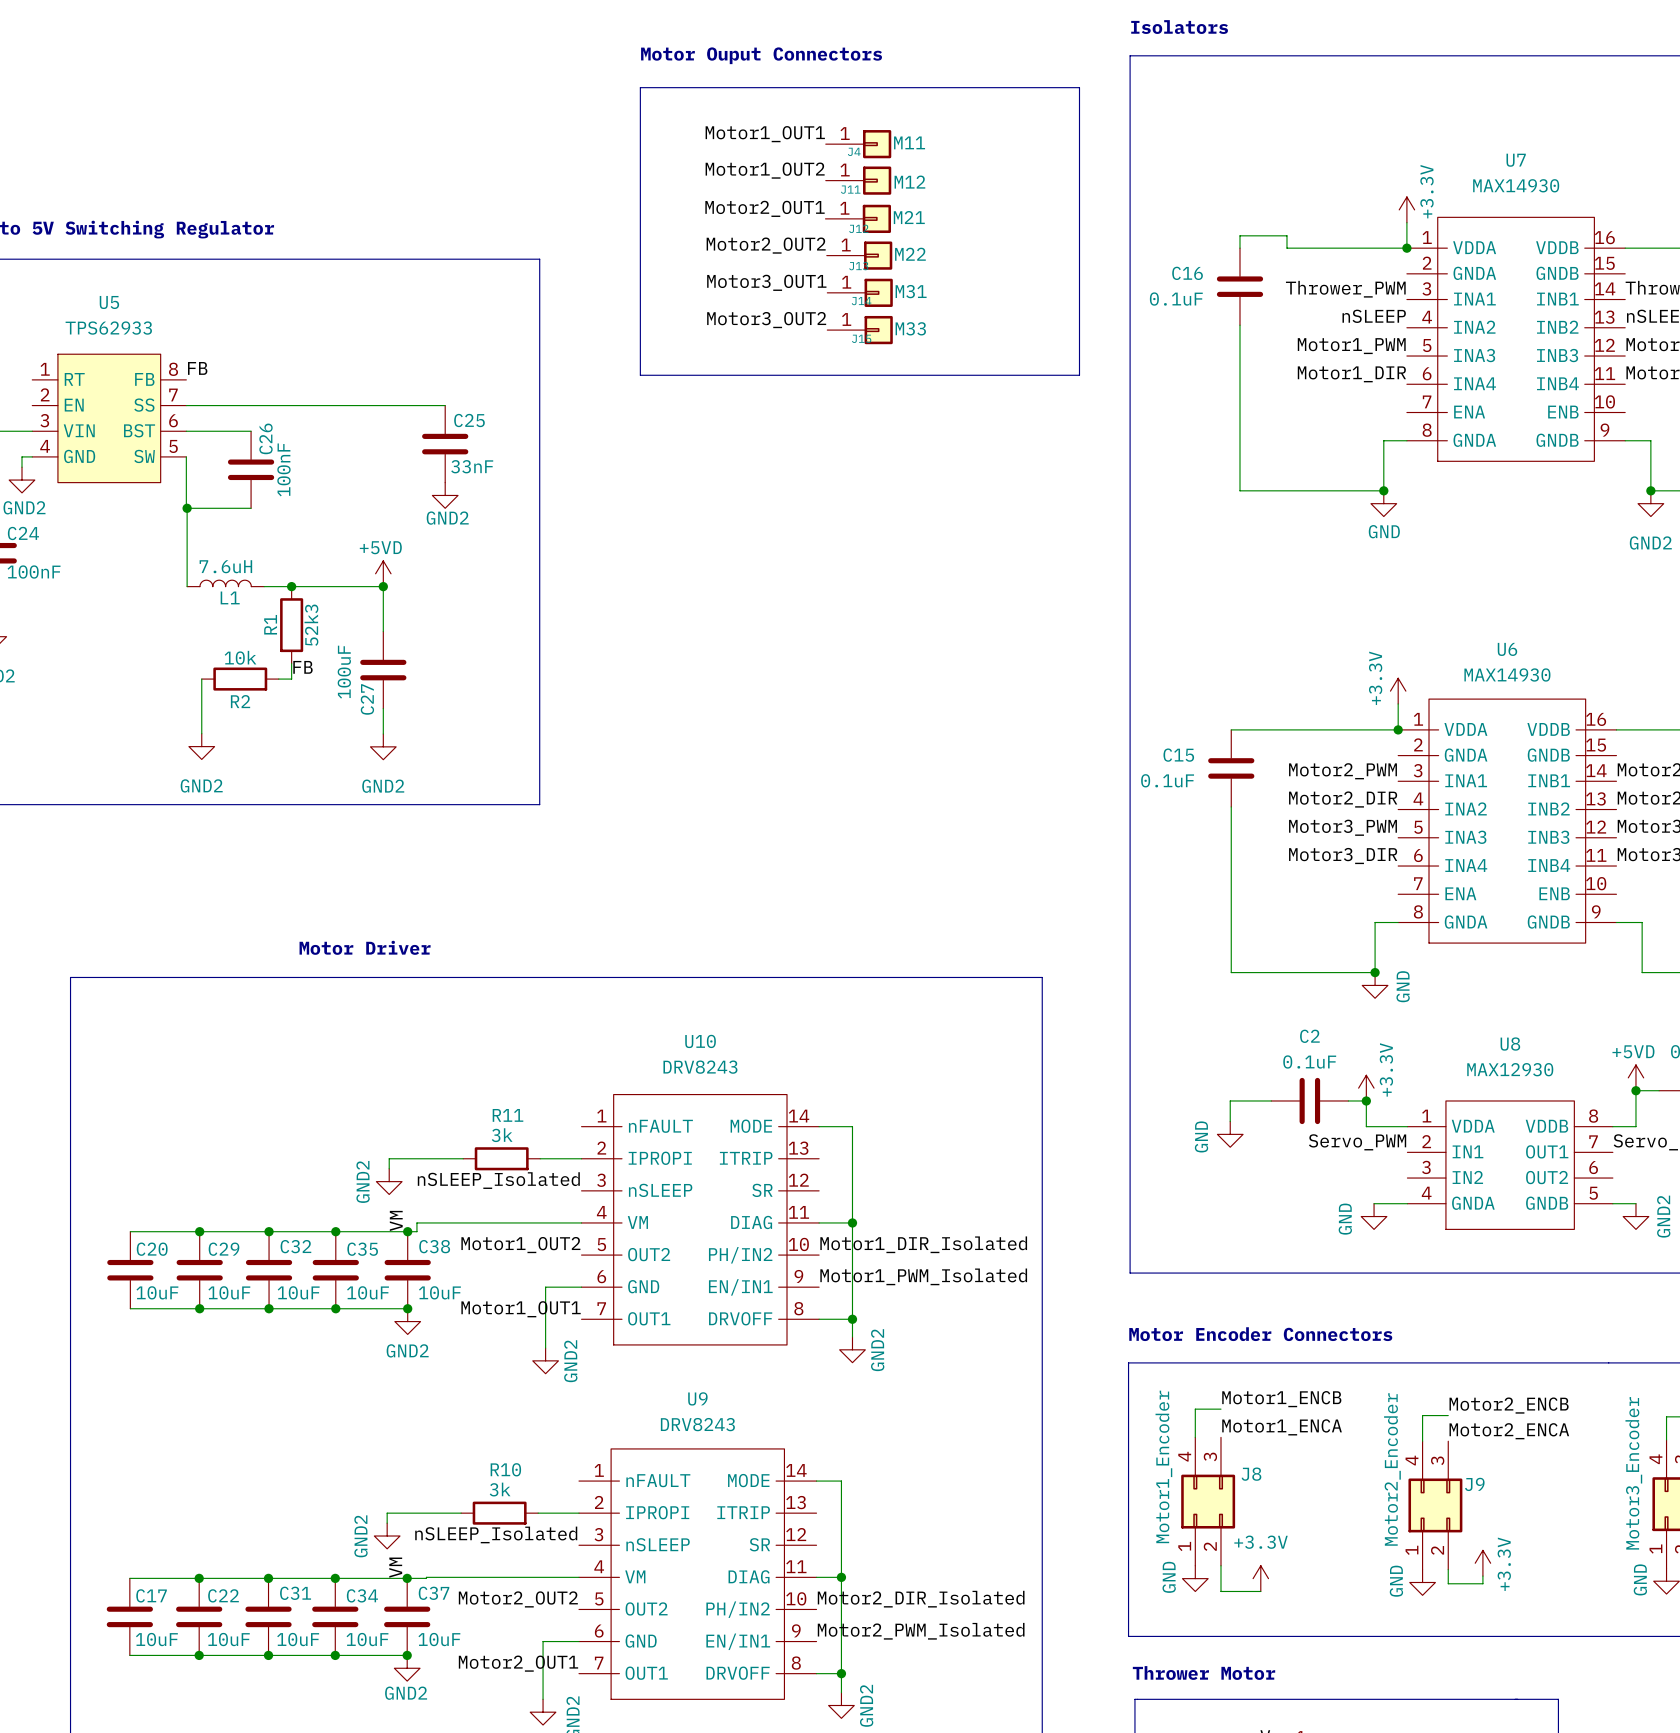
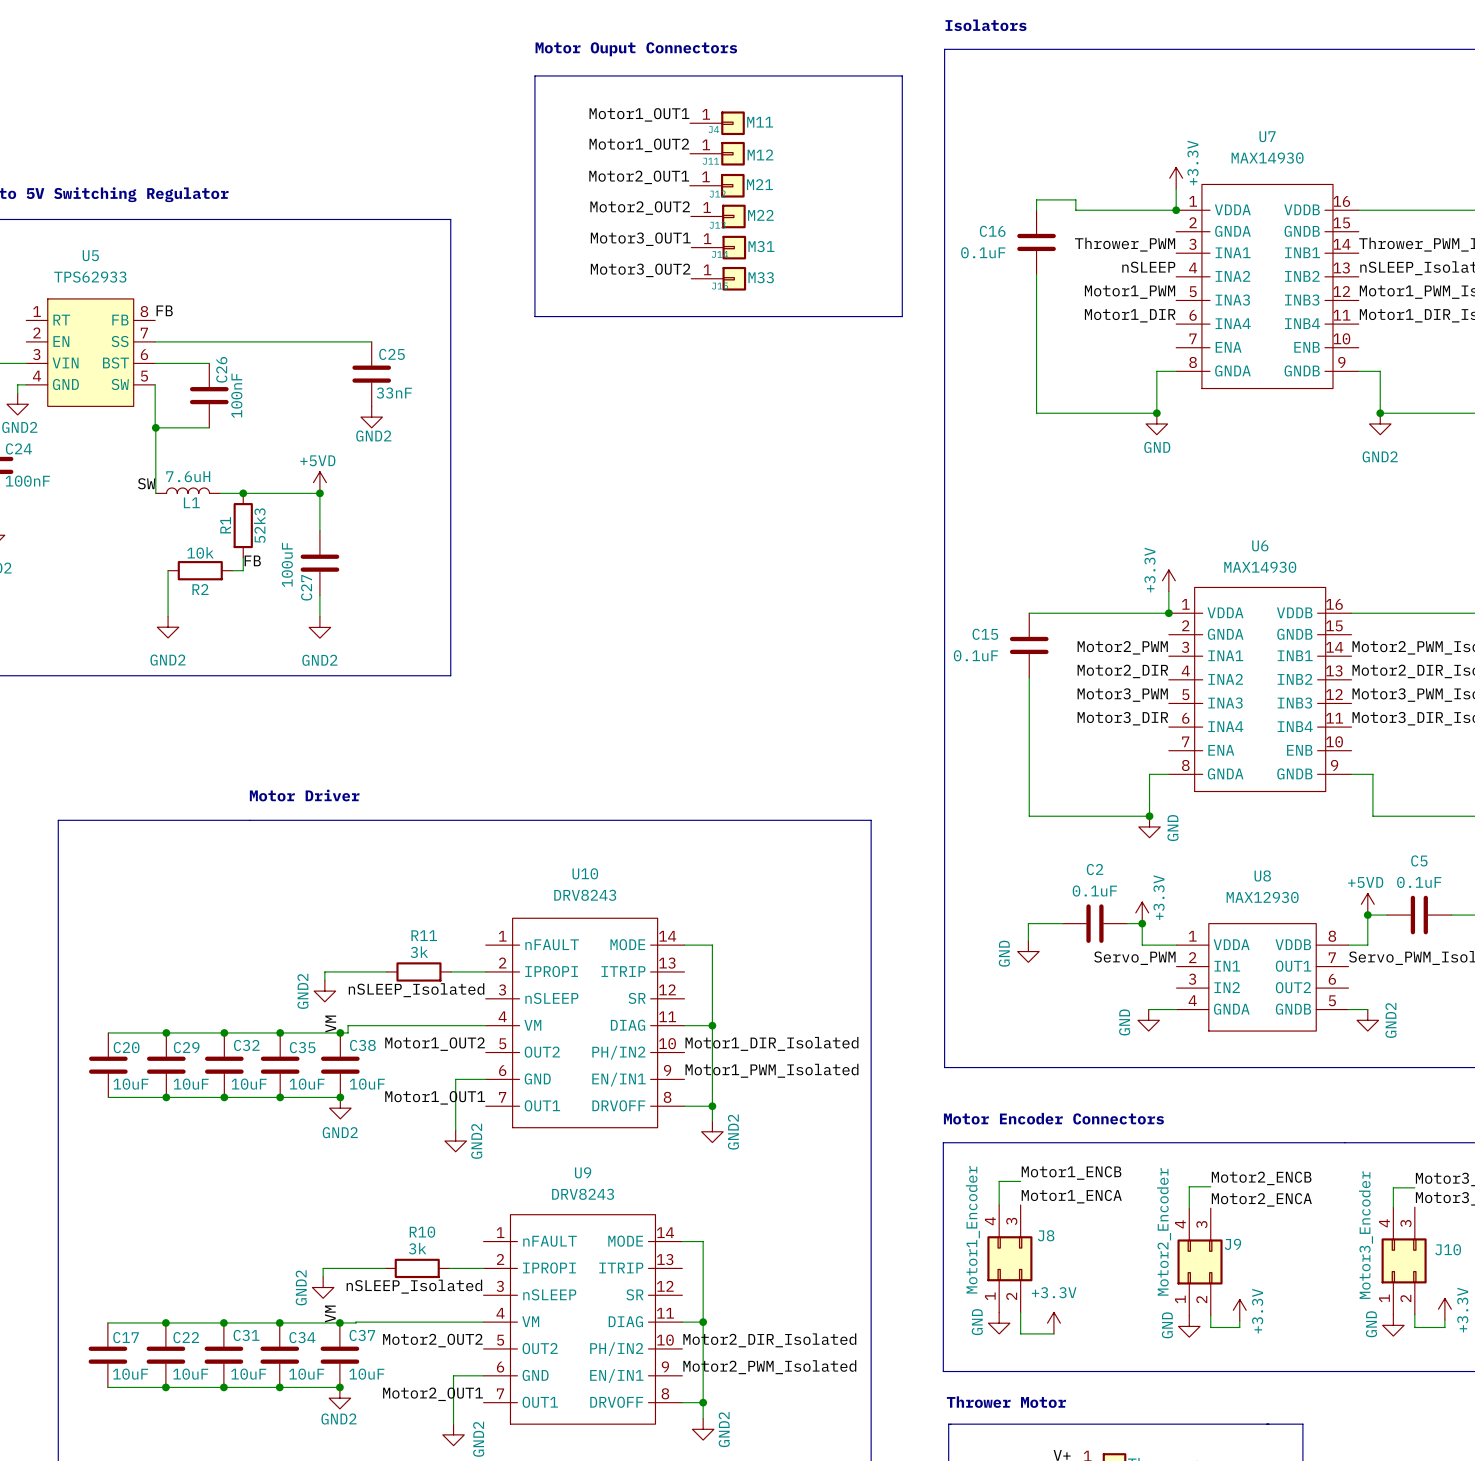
label: none -> SW (146, 483)

